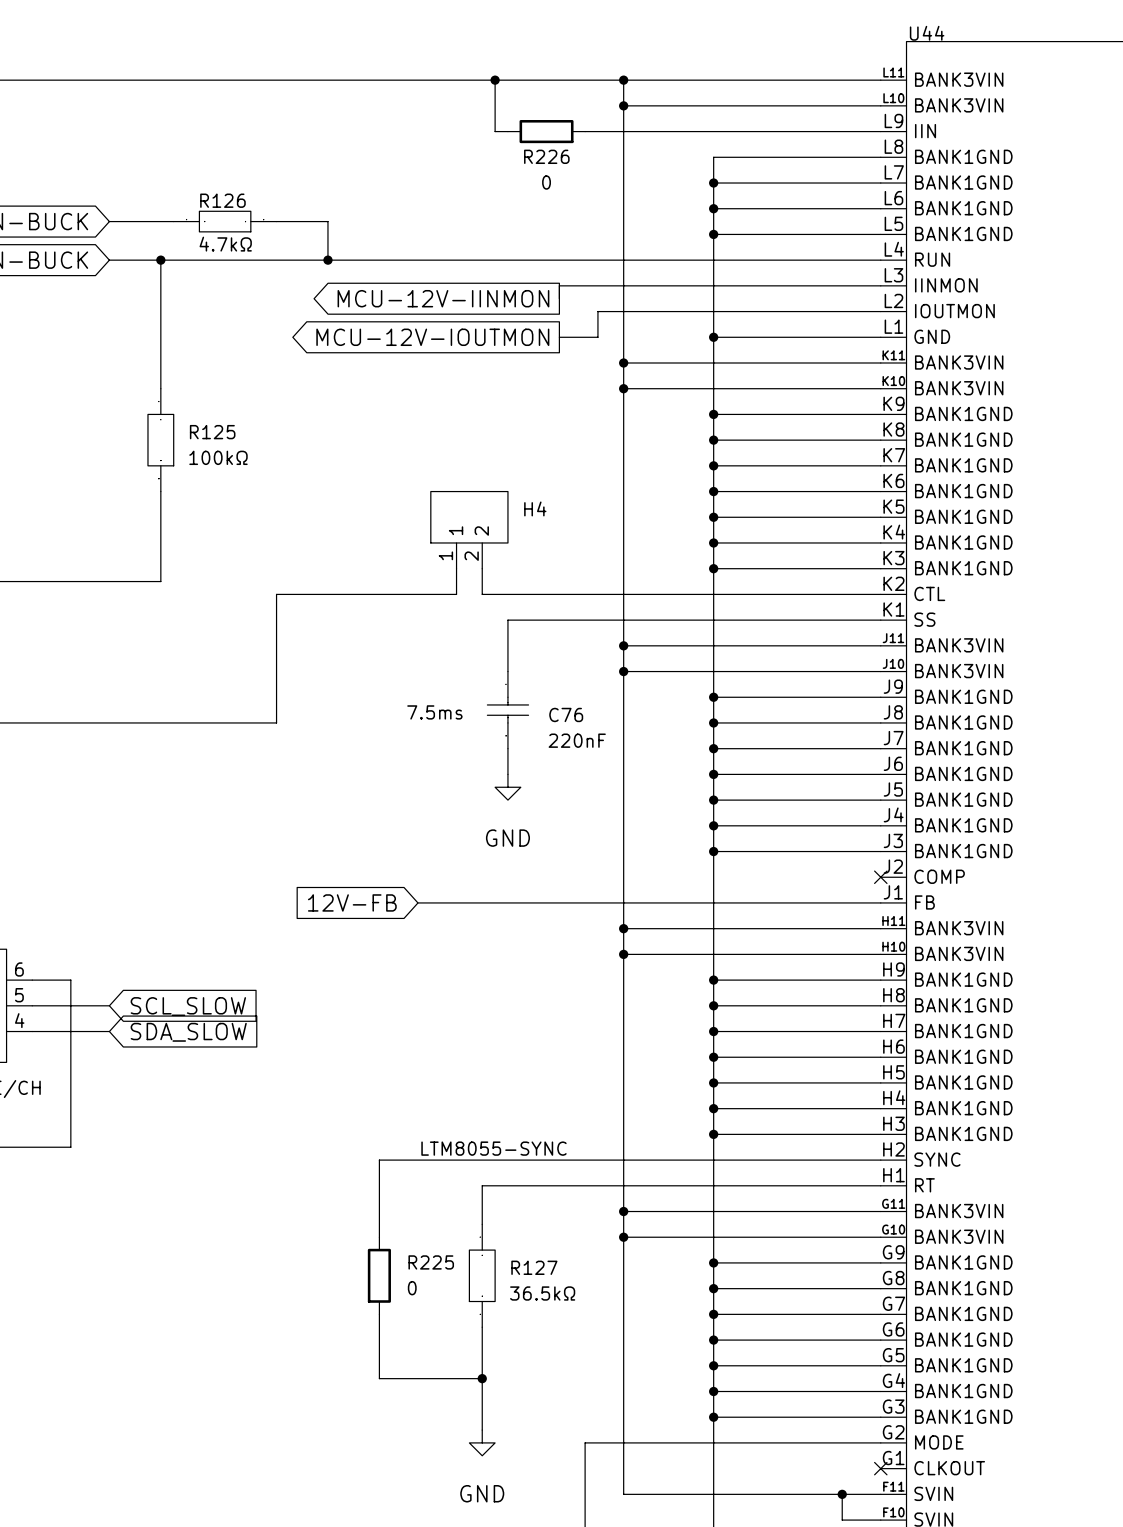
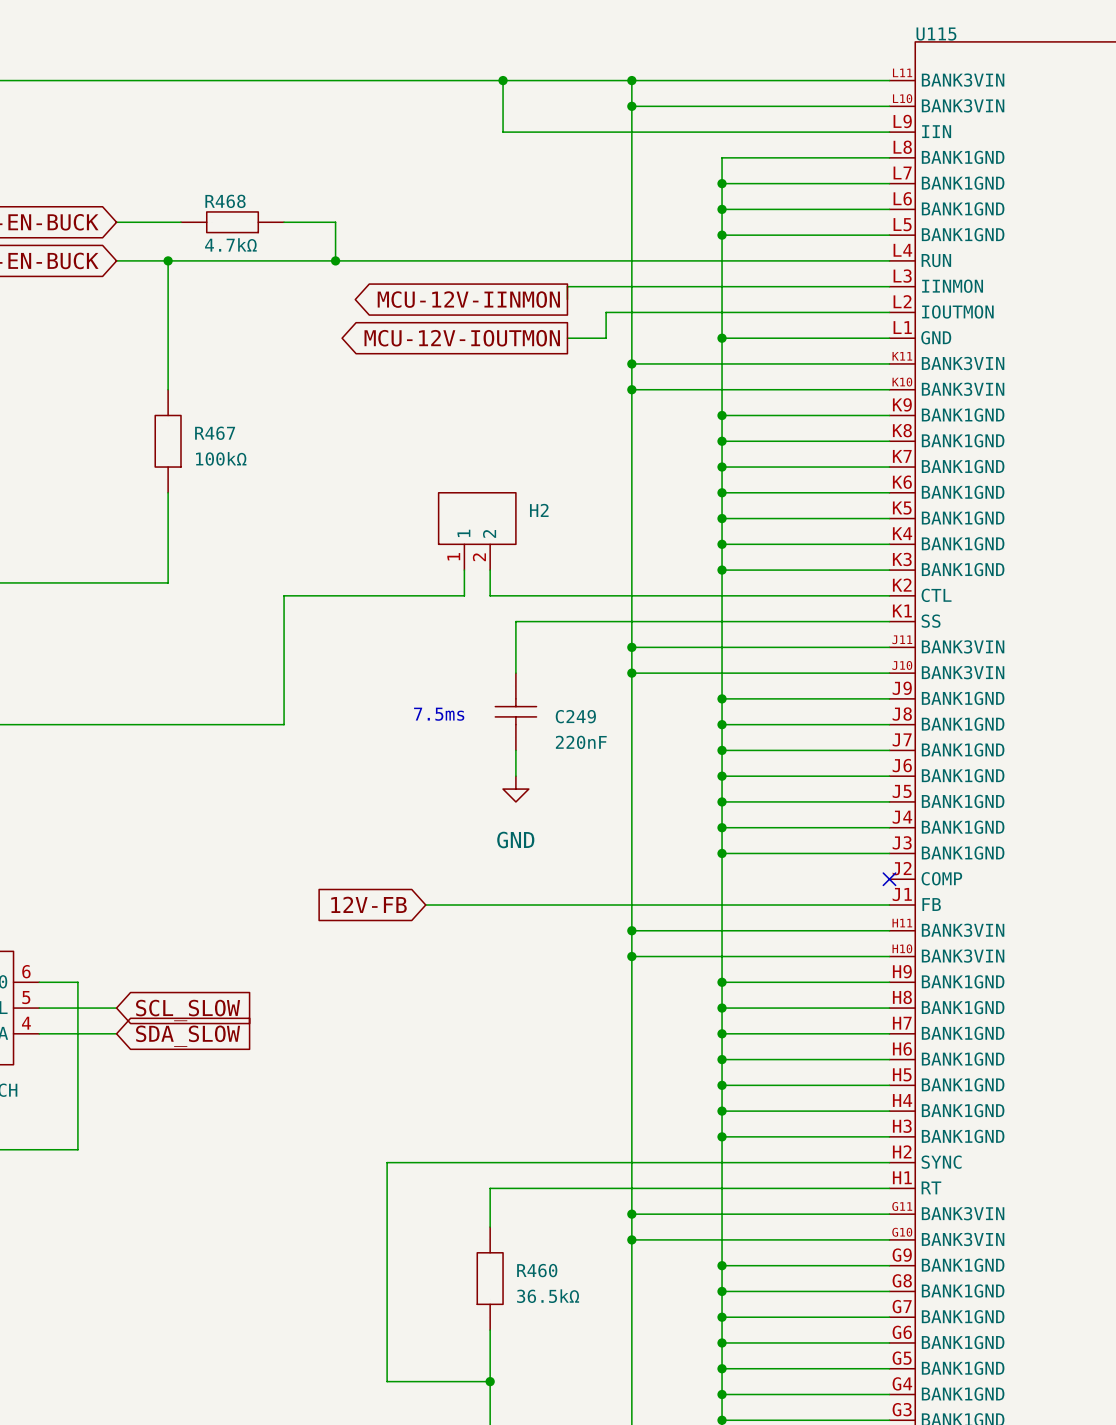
U44 name: U44 (927, 33) -> U115 (936, 34)
wire: none -> (515, 132) (593, 132)
R226: 0 (546, 131) -> none
R126 name: R126 (222, 200) -> R468 (225, 201)
R125 name: R125 (212, 432) -> R467 (215, 433)
H4 name: H4 (535, 508) -> H2 (539, 510)
C76 name: C76 (566, 714) -> C249 (575, 716)
label: LTM8055-SYNC (493, 1148) -> none
wire: none -> (387, 1239) (387, 1317)
R127 name: R127 (534, 1267) -> R460 (537, 1270)
R225: 0 (379, 1275) -> none

